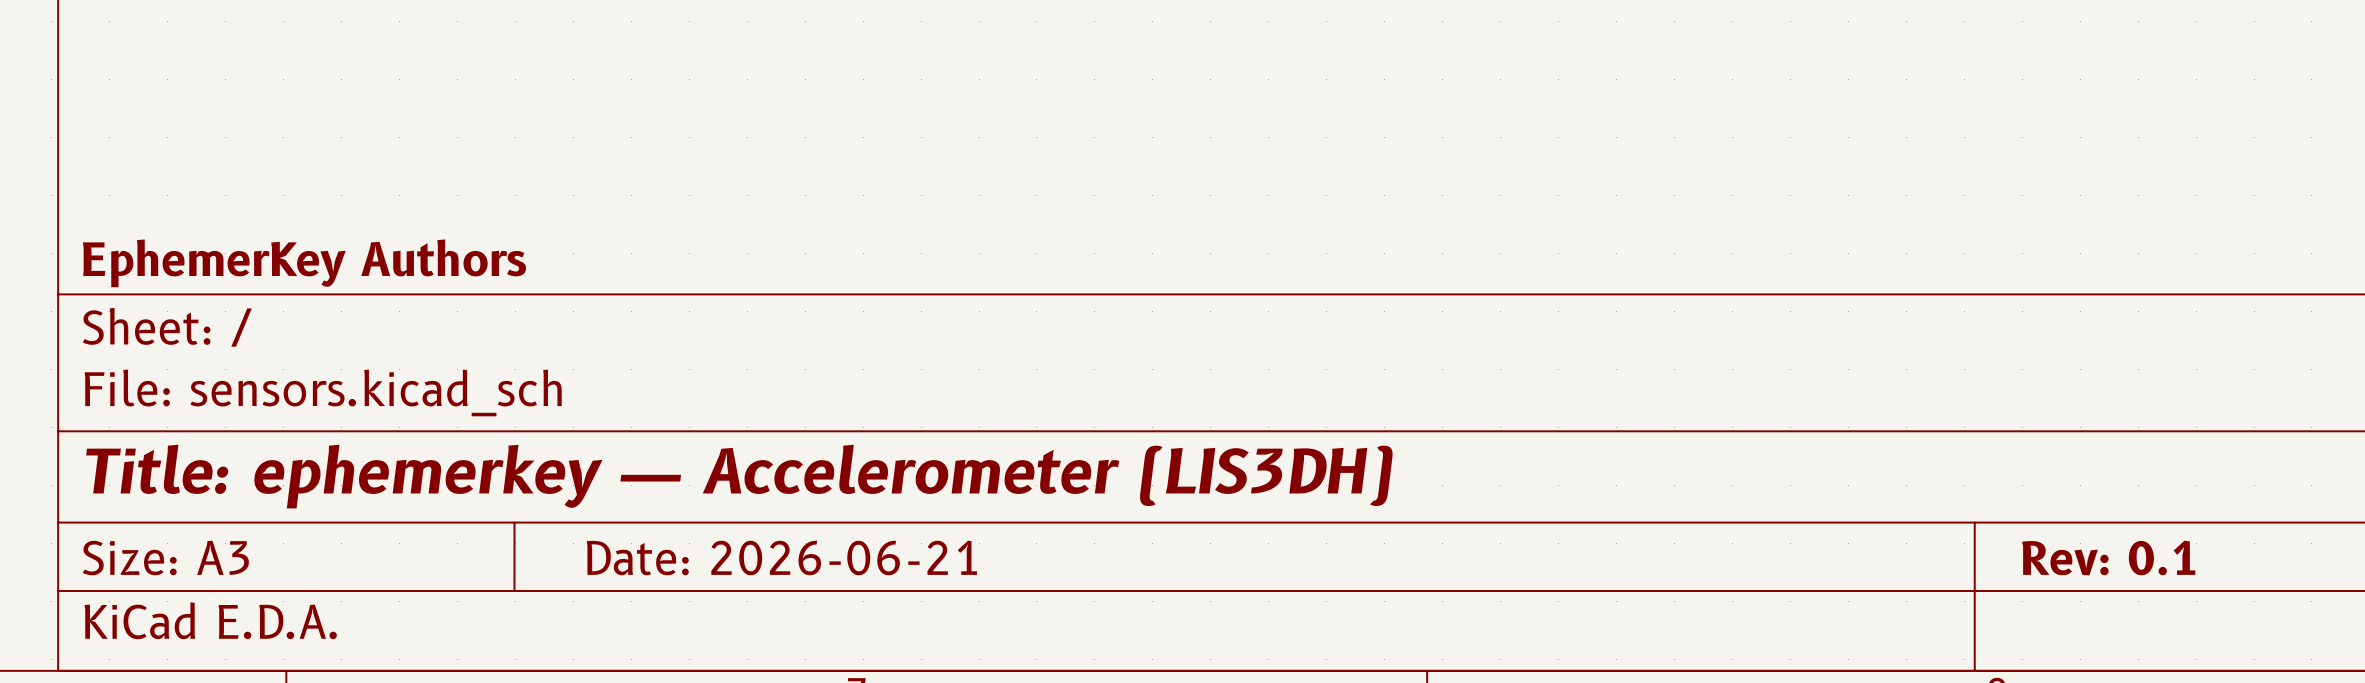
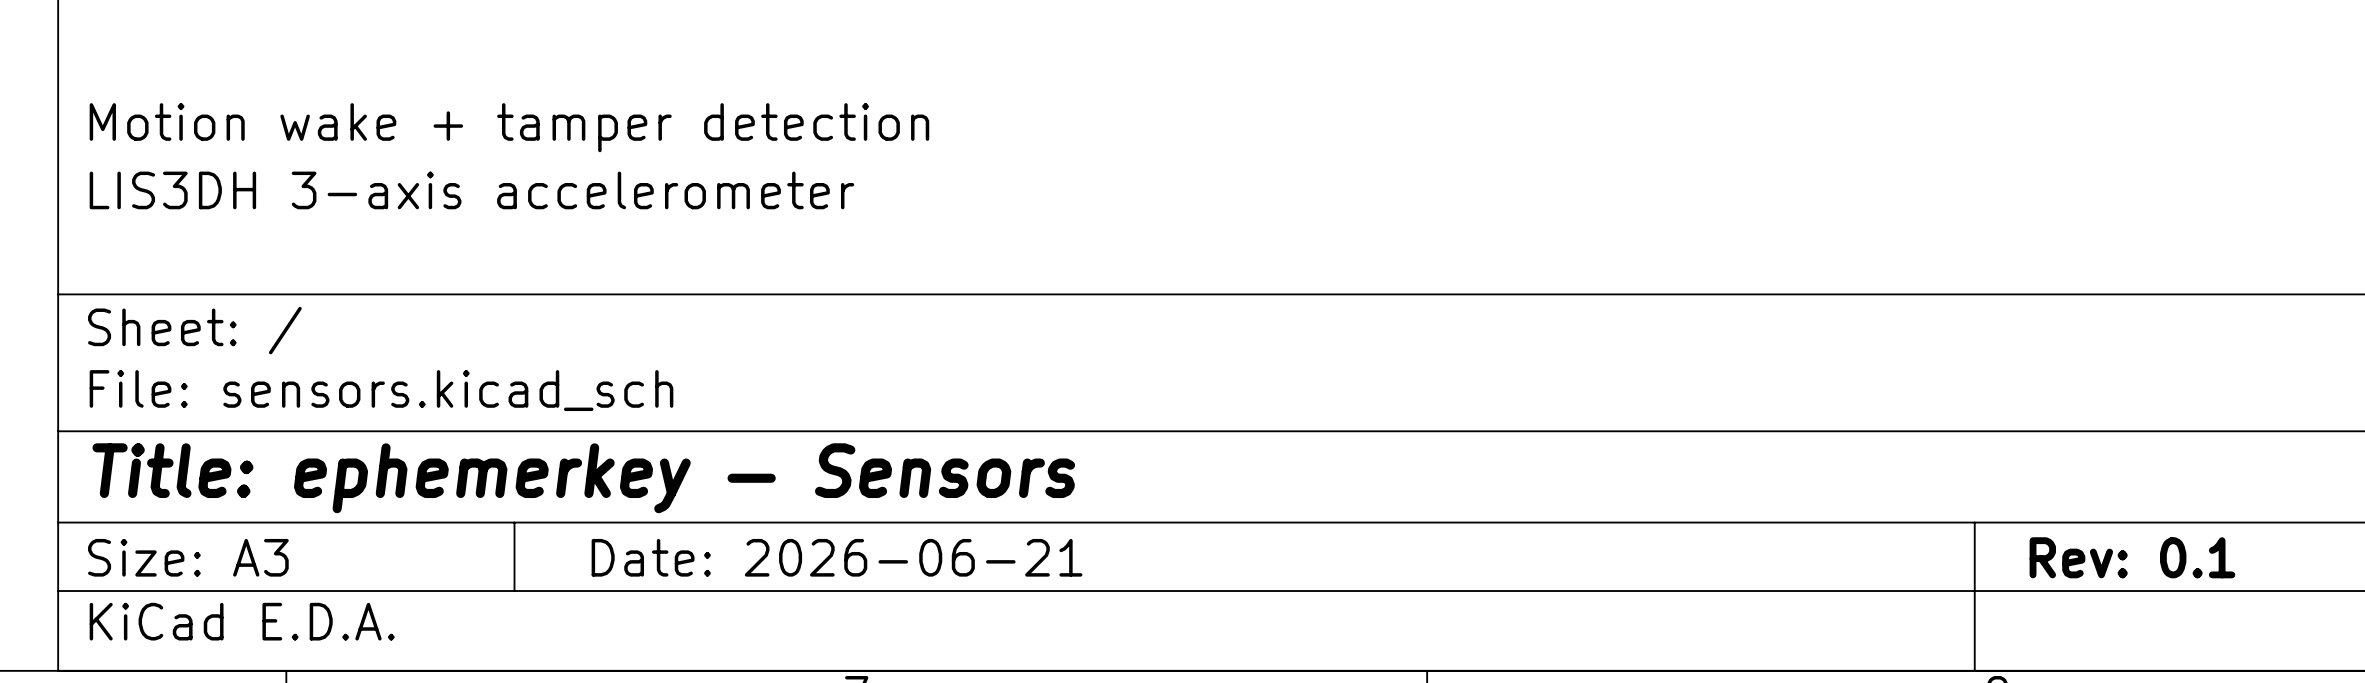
title block: none -> Motion wake + tamper detection (509, 127)
title block: none -> LIS3DH 3-axis accelerometer (471, 190)
title block: EphemerKey Authors (304, 263) -> none
title block: Title: ephemerkey — Accelerometer (LIS3DH) (739, 476) -> Title: ephemerkey — Sensors (583, 478)

